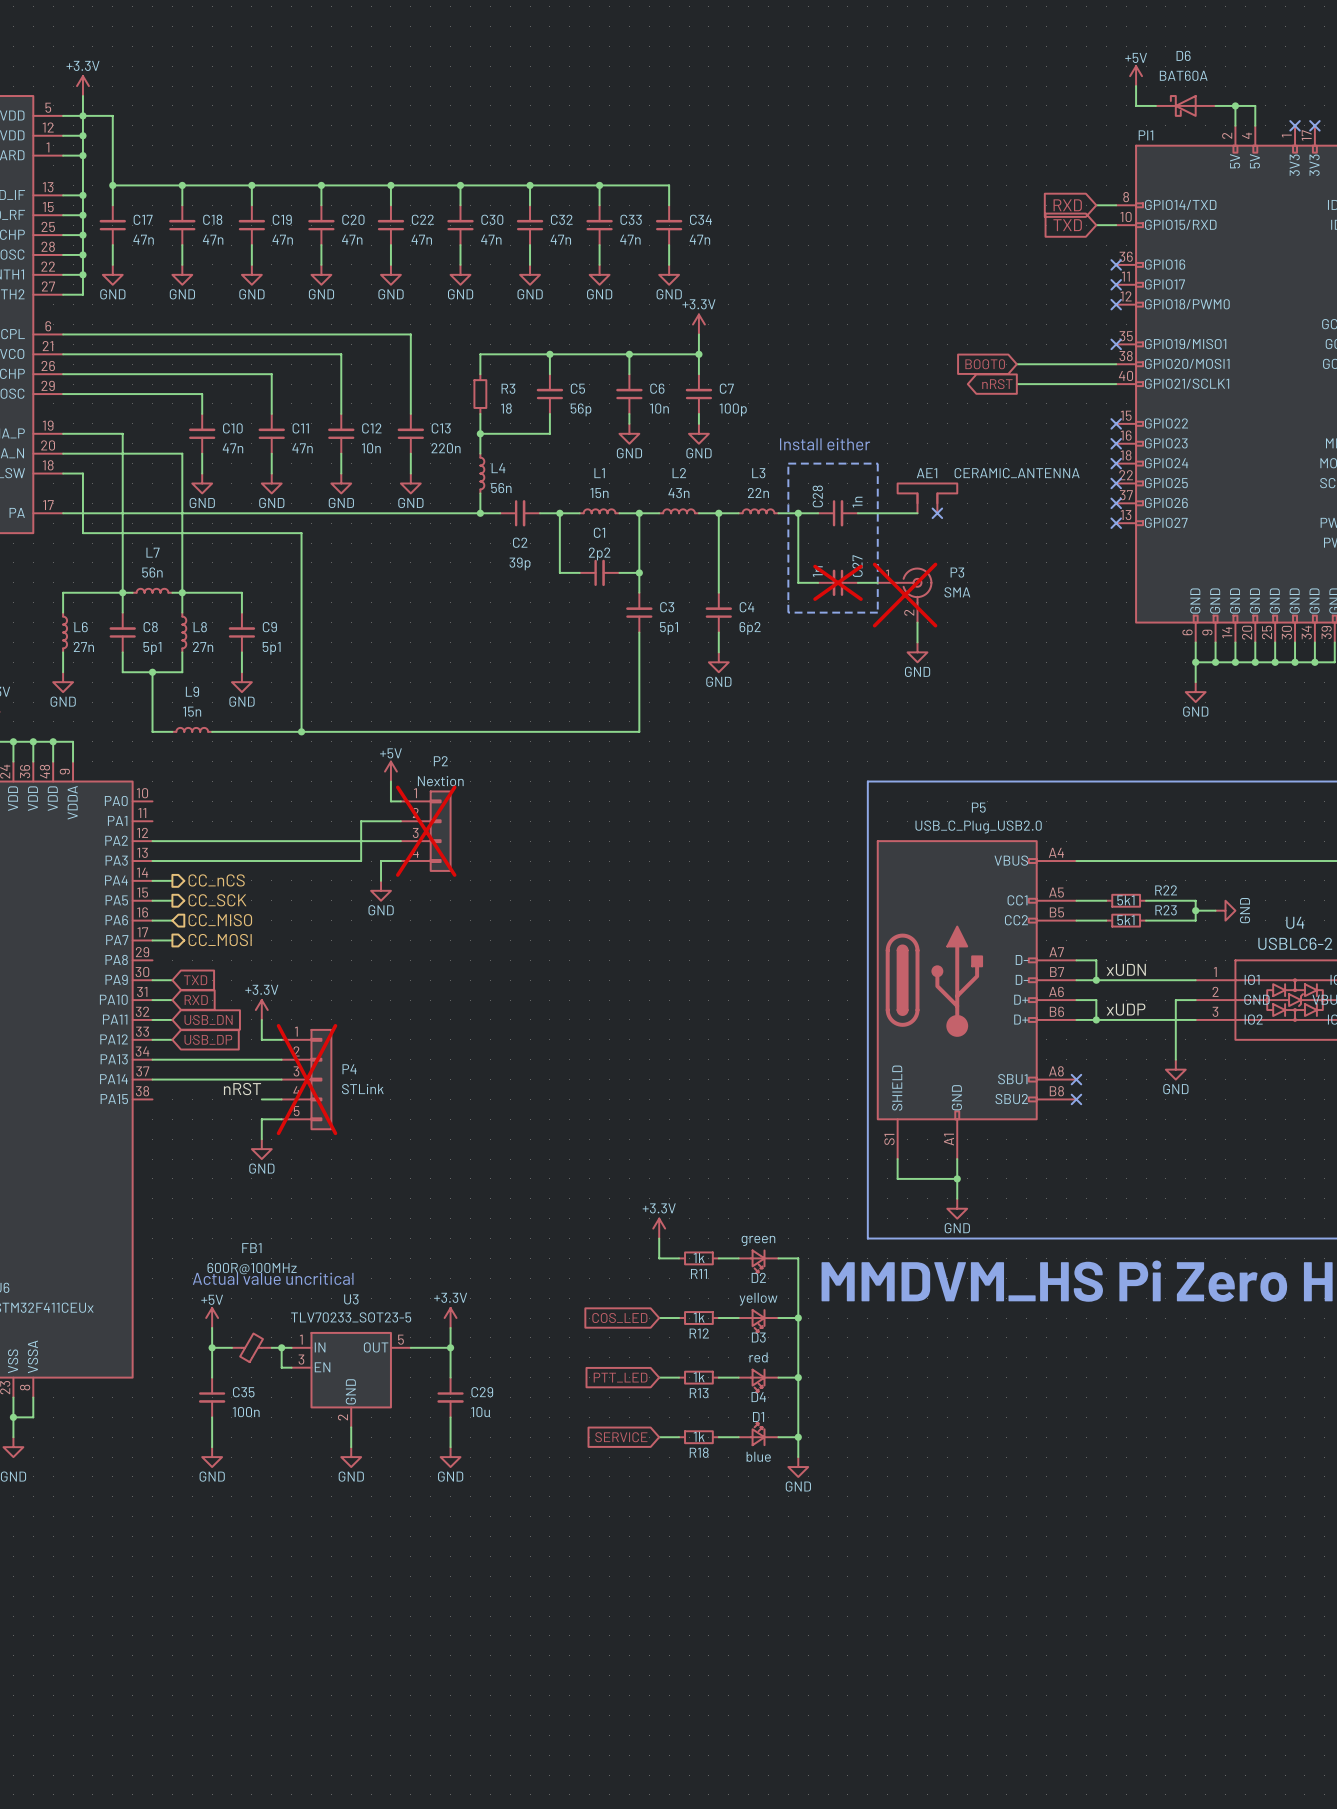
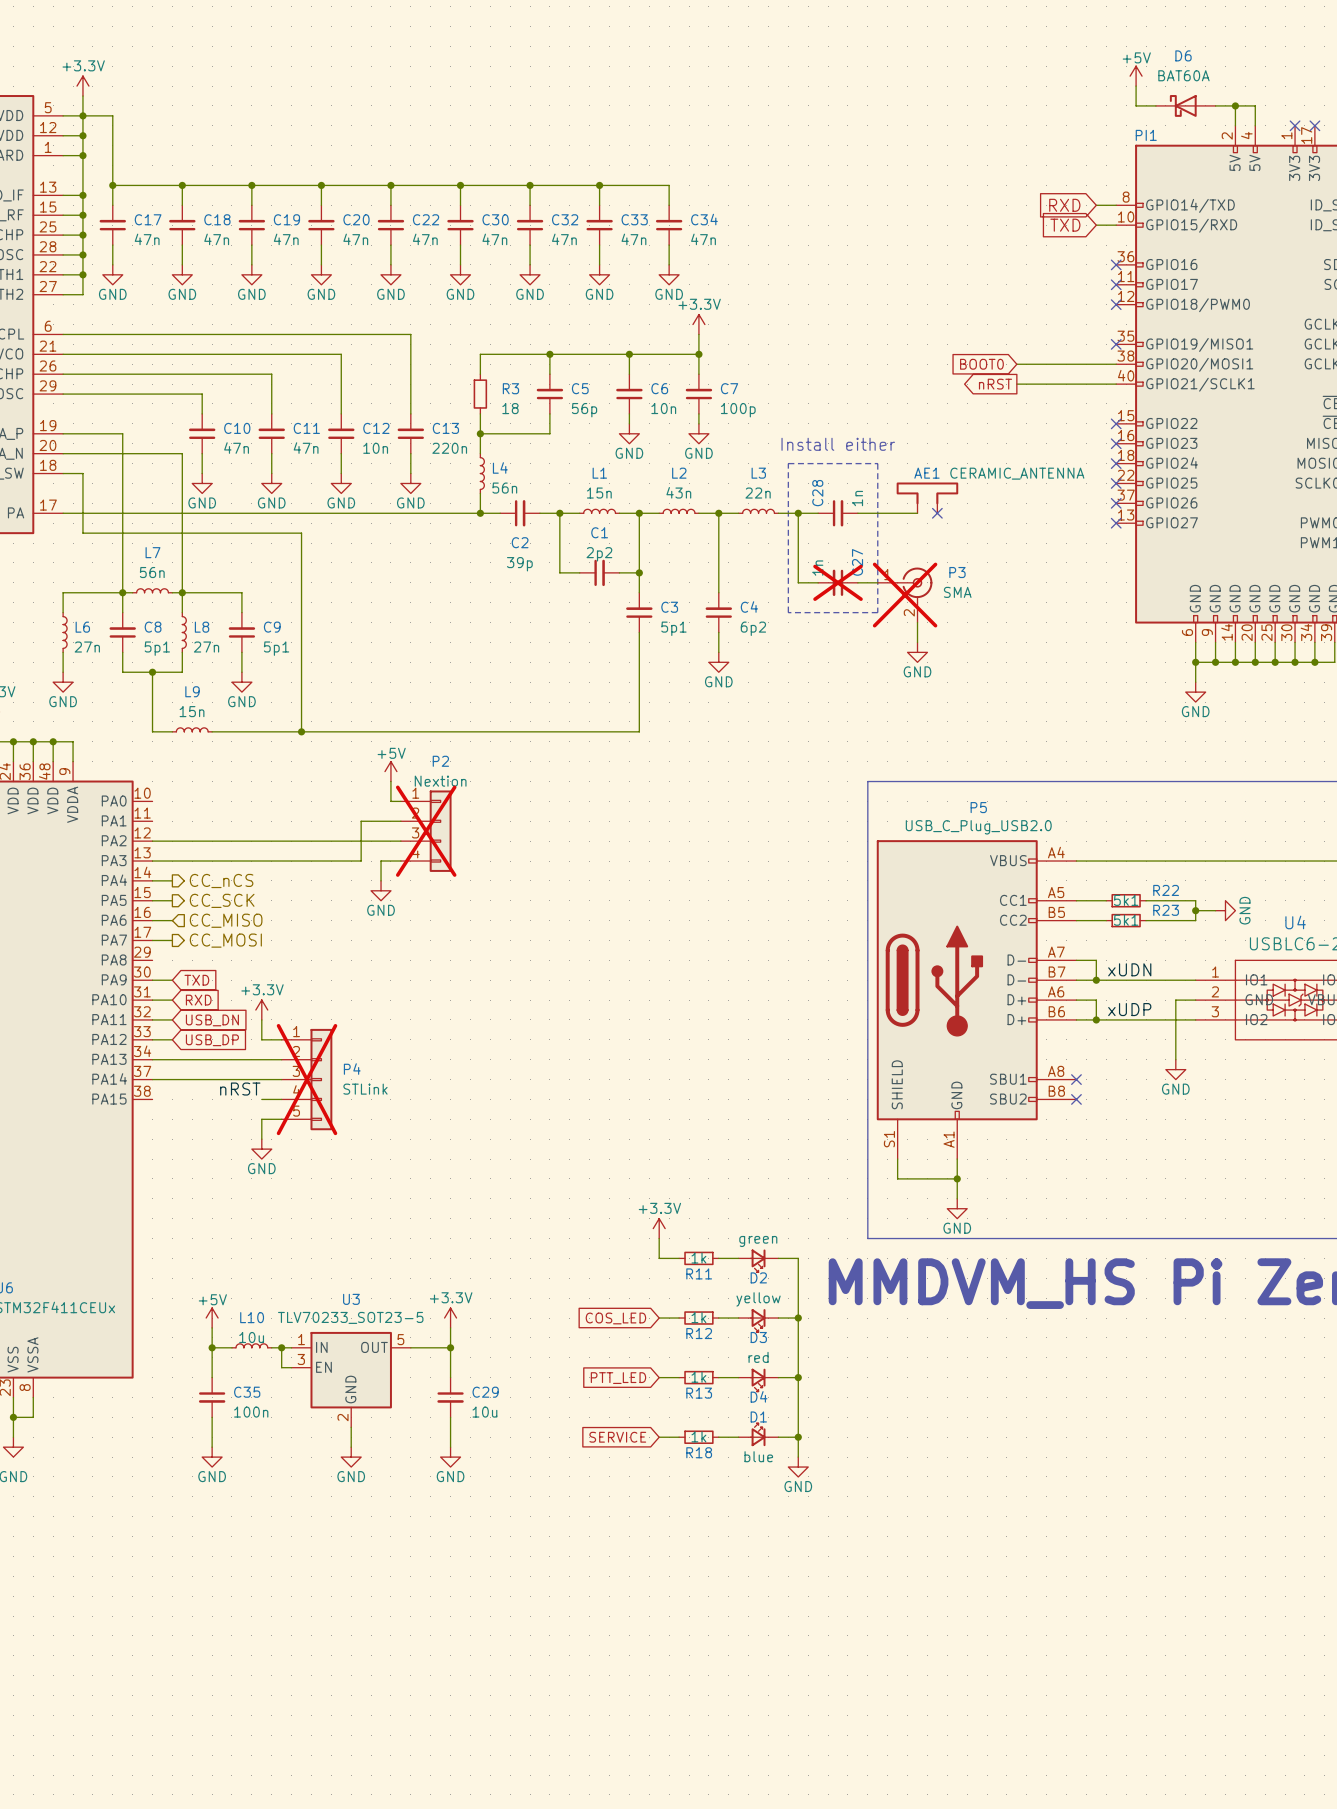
text: Actual value uncritical (273, 1278) -> none
L10: none -> 10u (251, 1345)
FB1: 600R@100MHz (251, 1347) -> none

